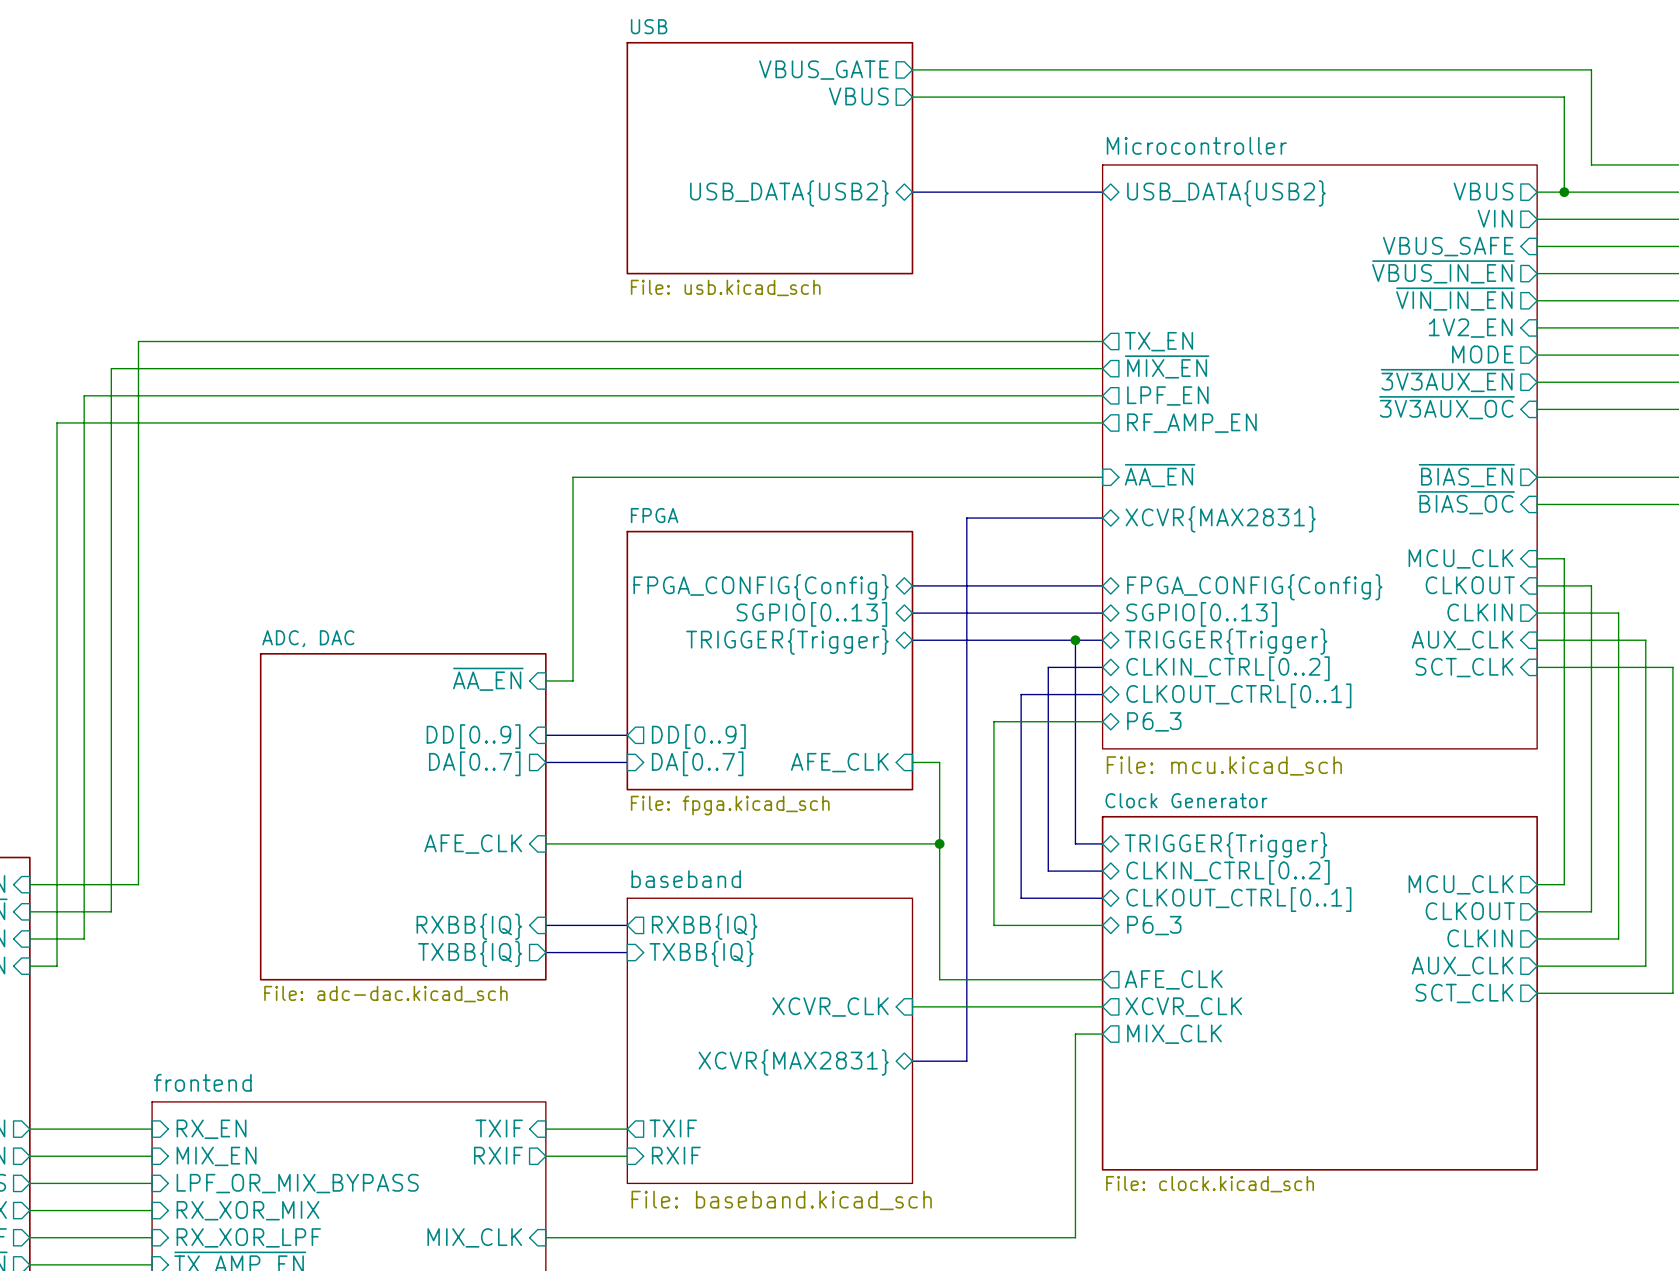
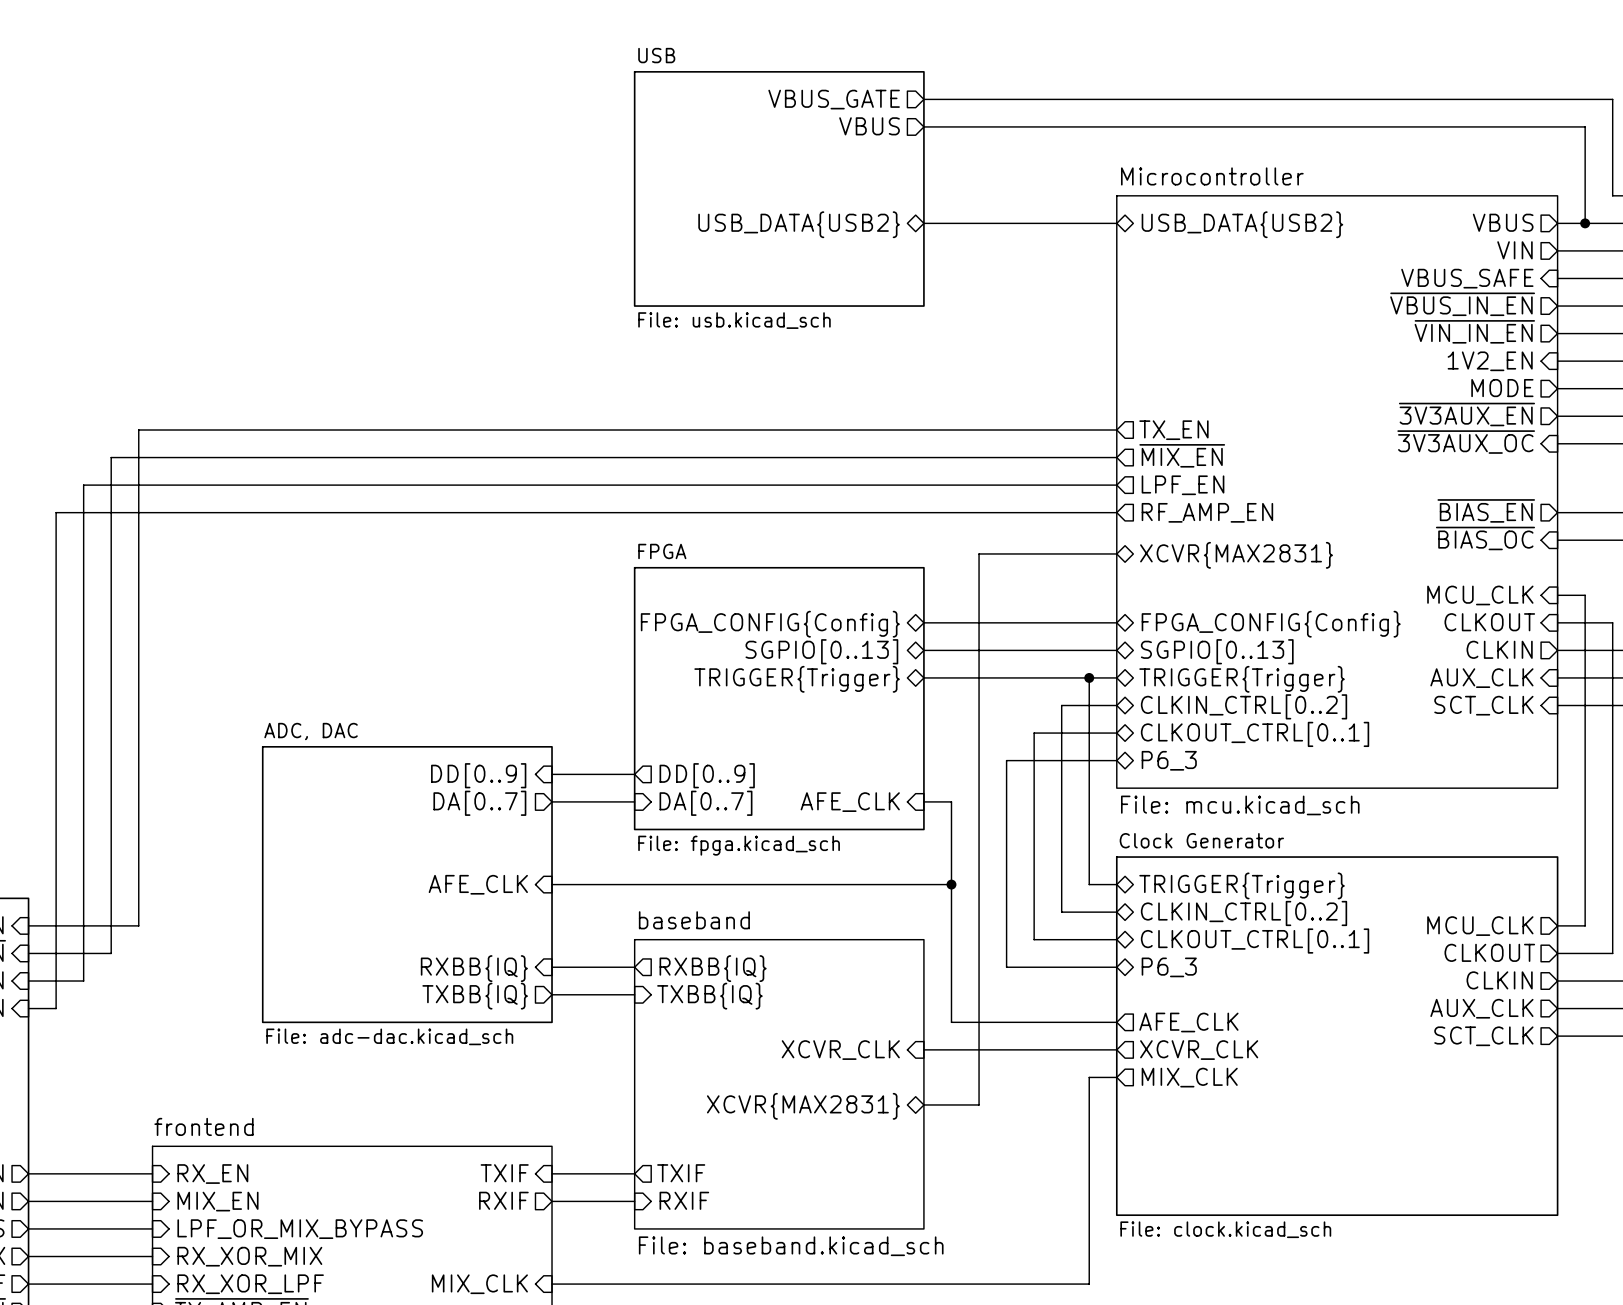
wire: (1102, 341) (138, 341) (138, 395) (84, 395) (84, 450) -> (1116, 485) (83, 485)
sheet pin: TX_EN (1158, 341) -> none
sheet pin: ~{MIX_EN} (1167, 366) -> none
wire: (1102, 368) (111, 368) (111, 422) (57, 422) (57, 477) -> none
sheet pin: LPF_EN (1167, 395) -> TX_EN (1173, 430)
sheet pin: RF_AMP_EN (1191, 423) -> ~{MIX_EN} (1182, 455)
sheet pin: none -> LPF_EN (1183, 485)
sheet pin shape: input (1160, 475) -> output (1207, 512)
sheet pin: ~{AA_EN} (1160, 475) -> RF_AMP_EN (1207, 512)
wire: (573, 477) (573, 680) (545, 680) -> (579, 512) (56, 512)
sheet pin: ~{AA_EN} (488, 679) -> none
sheet ADC, DAC: File: adc-dac.kicad_sch (403, 816) -> none
sheet ADC, DAC: none -> File: adc-dac.kicad_sch (407, 884)

